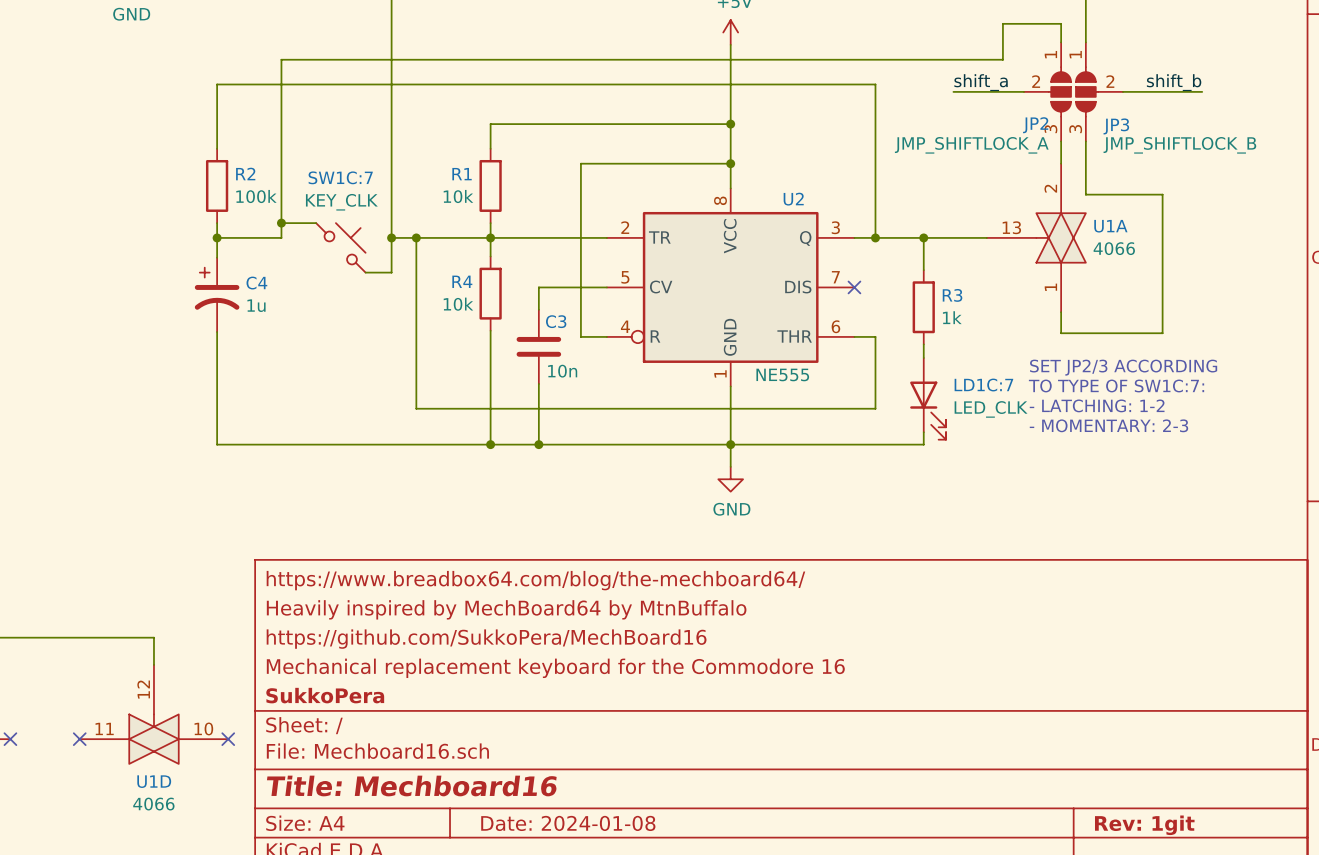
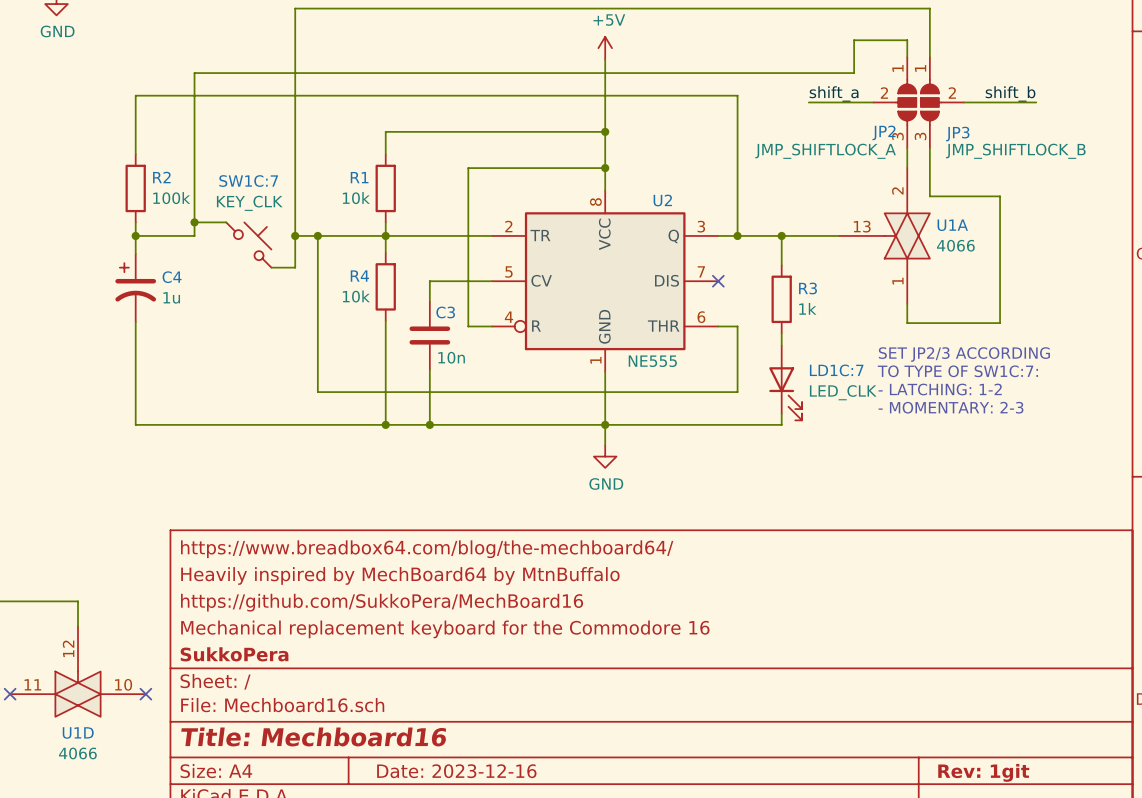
title block: Date: 2024-01-08 (568, 823) -> Date: 2023-12-16 (456, 771)

